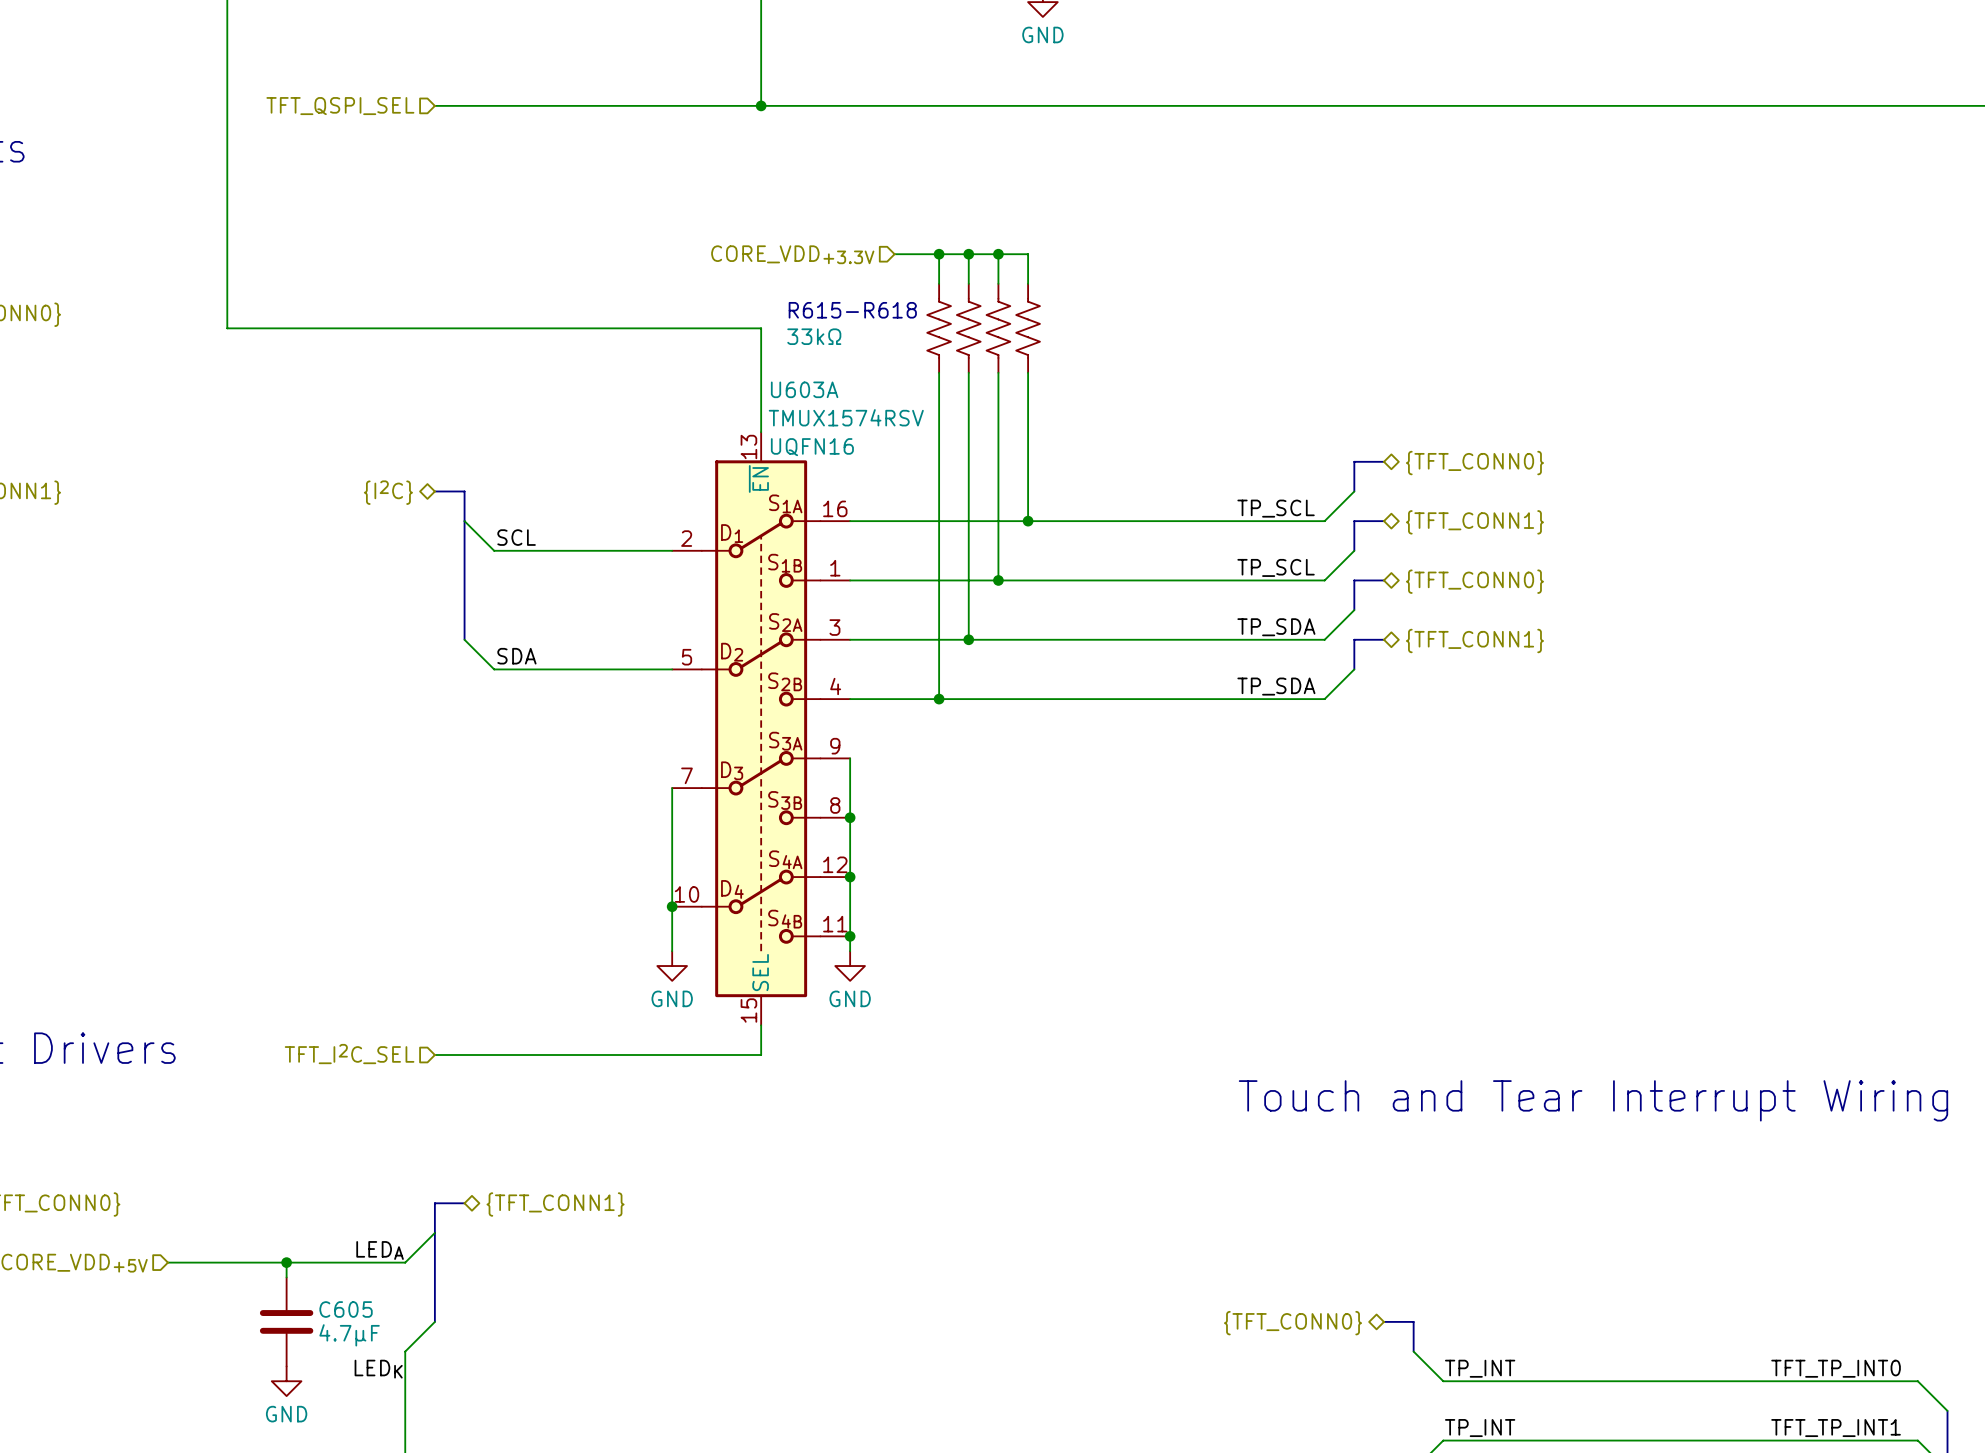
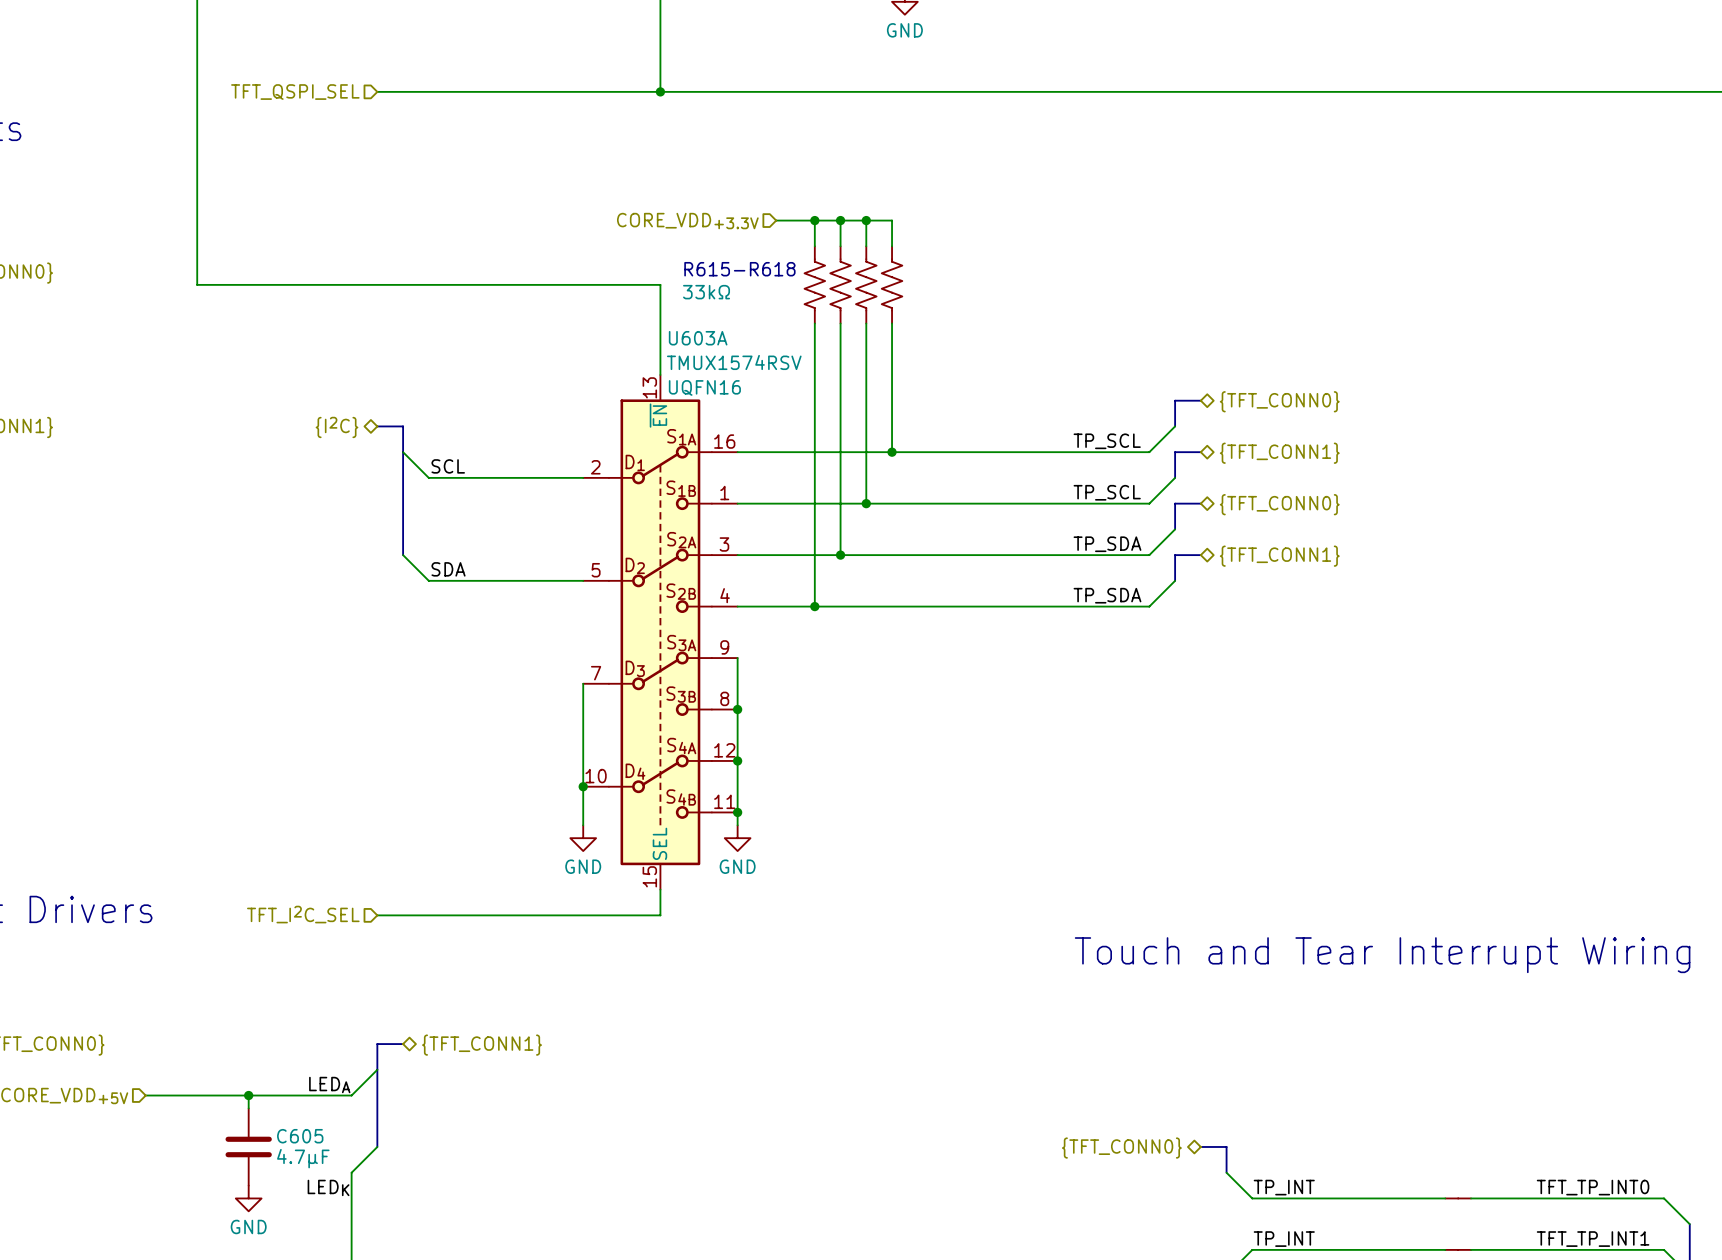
part: none -> (1458, 1198)
part: none -> (1458, 1249)

